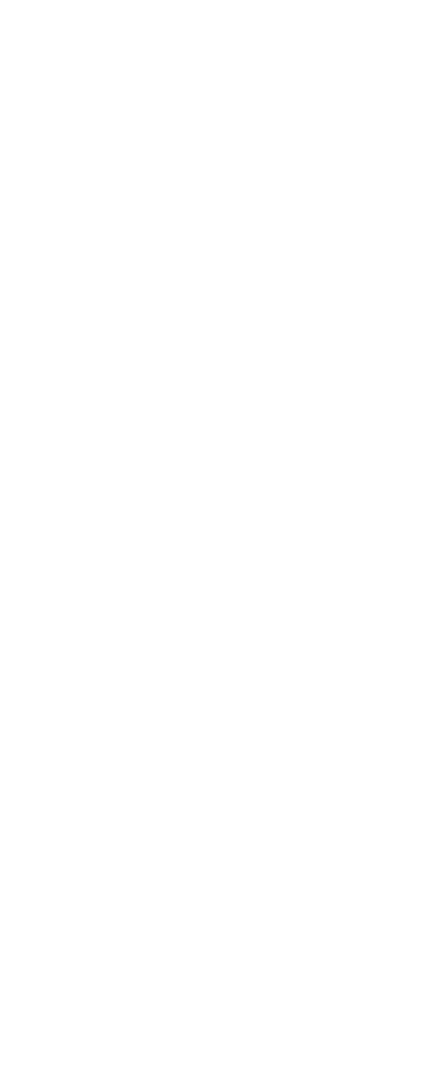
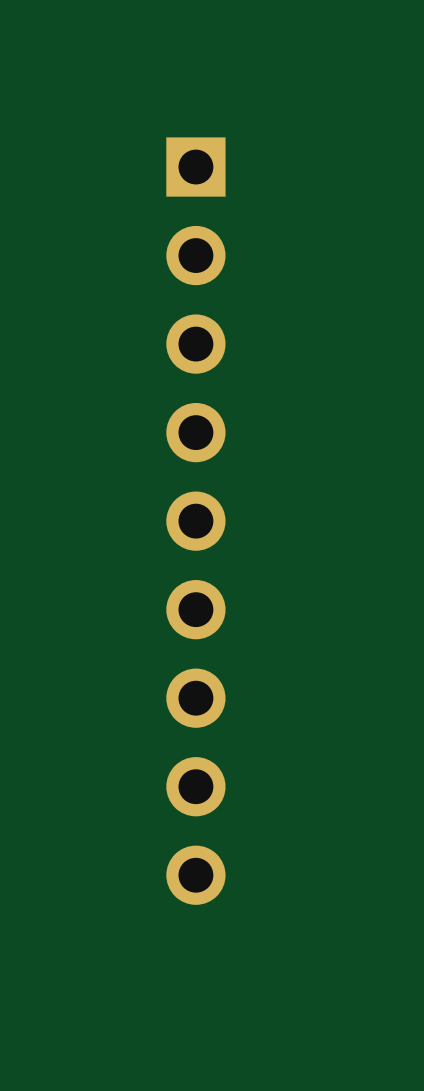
part: none -> (195, 521)

